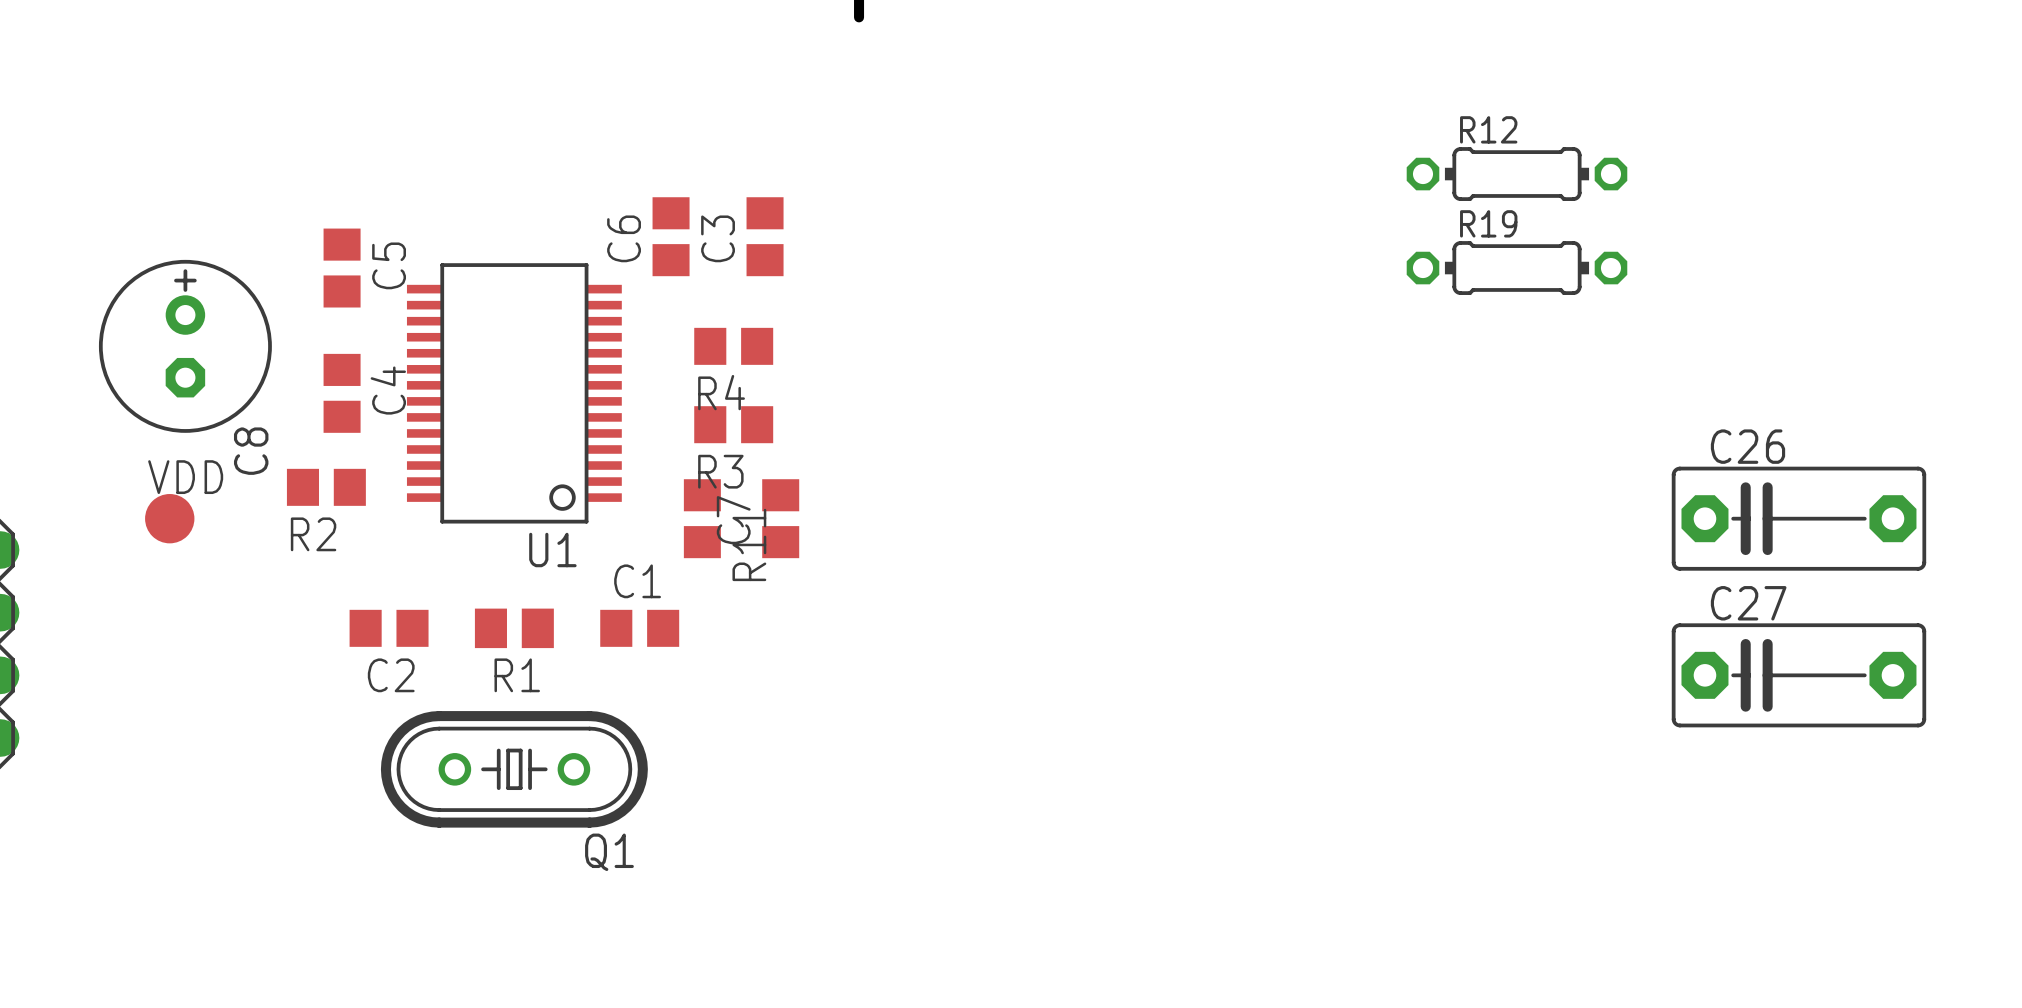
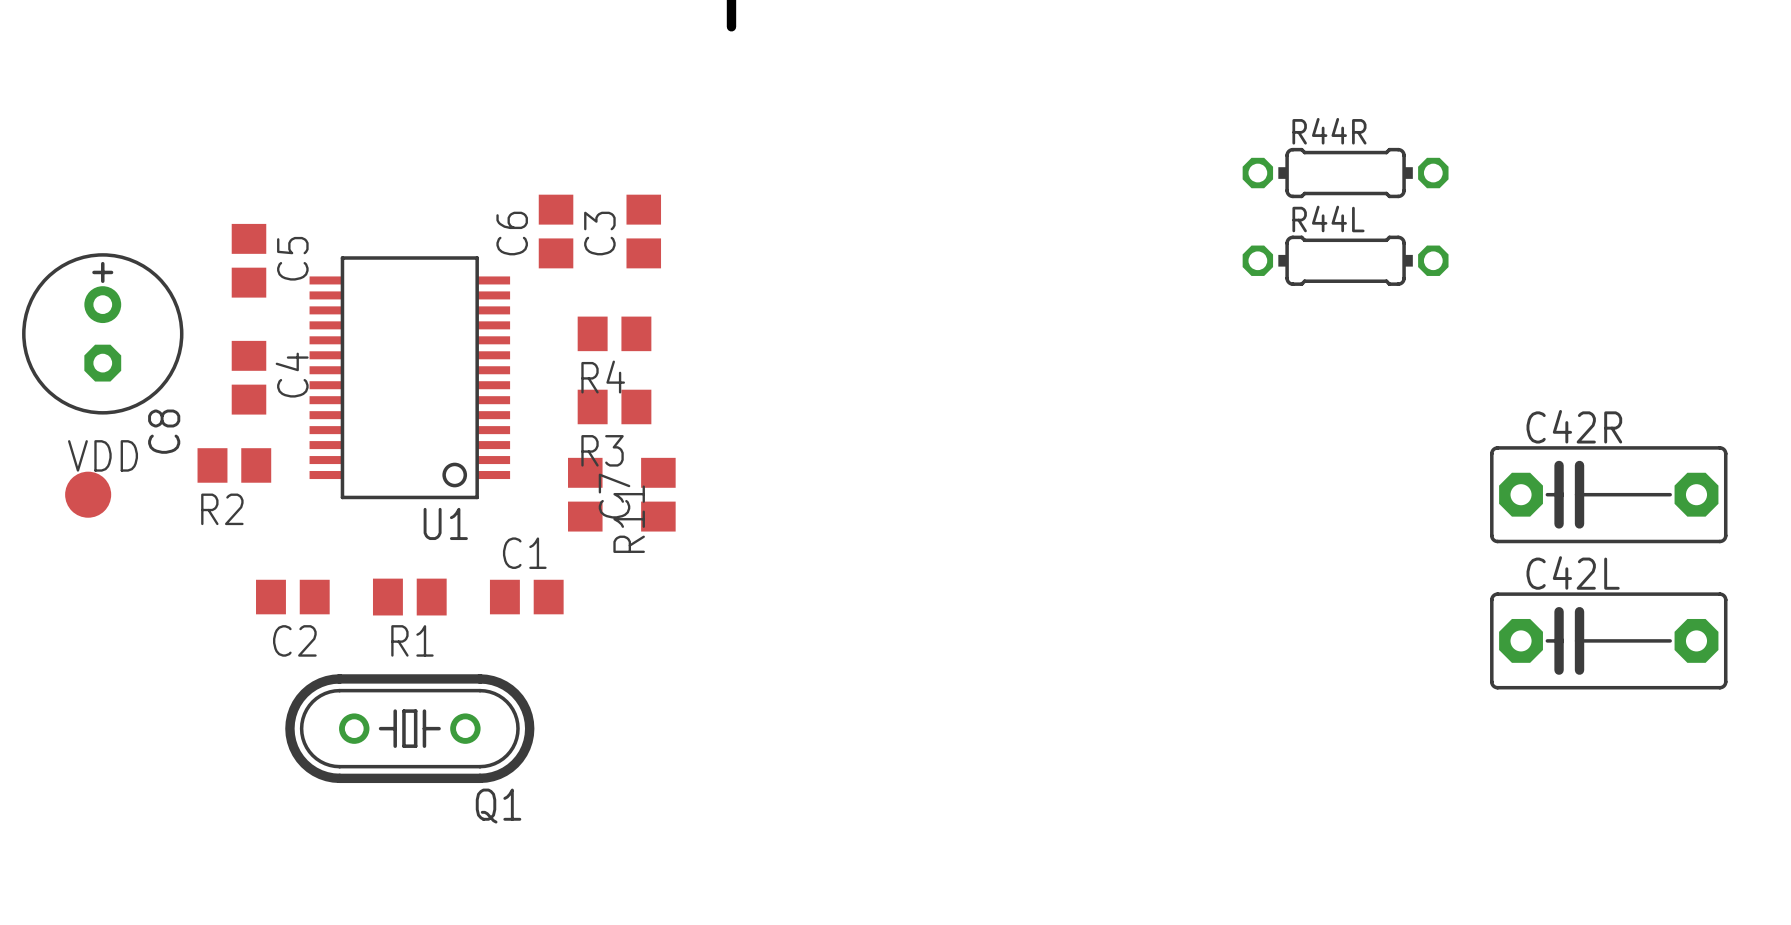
R12 name: R12 (1488, 129) -> R44R (1329, 131)
R19 name: R19 (1488, 223) -> R44L (1328, 218)
C26 name: C26 (1747, 446) -> C42R (1574, 426)
C27 name: C27 (1748, 603) -> C42L (1573, 572)

